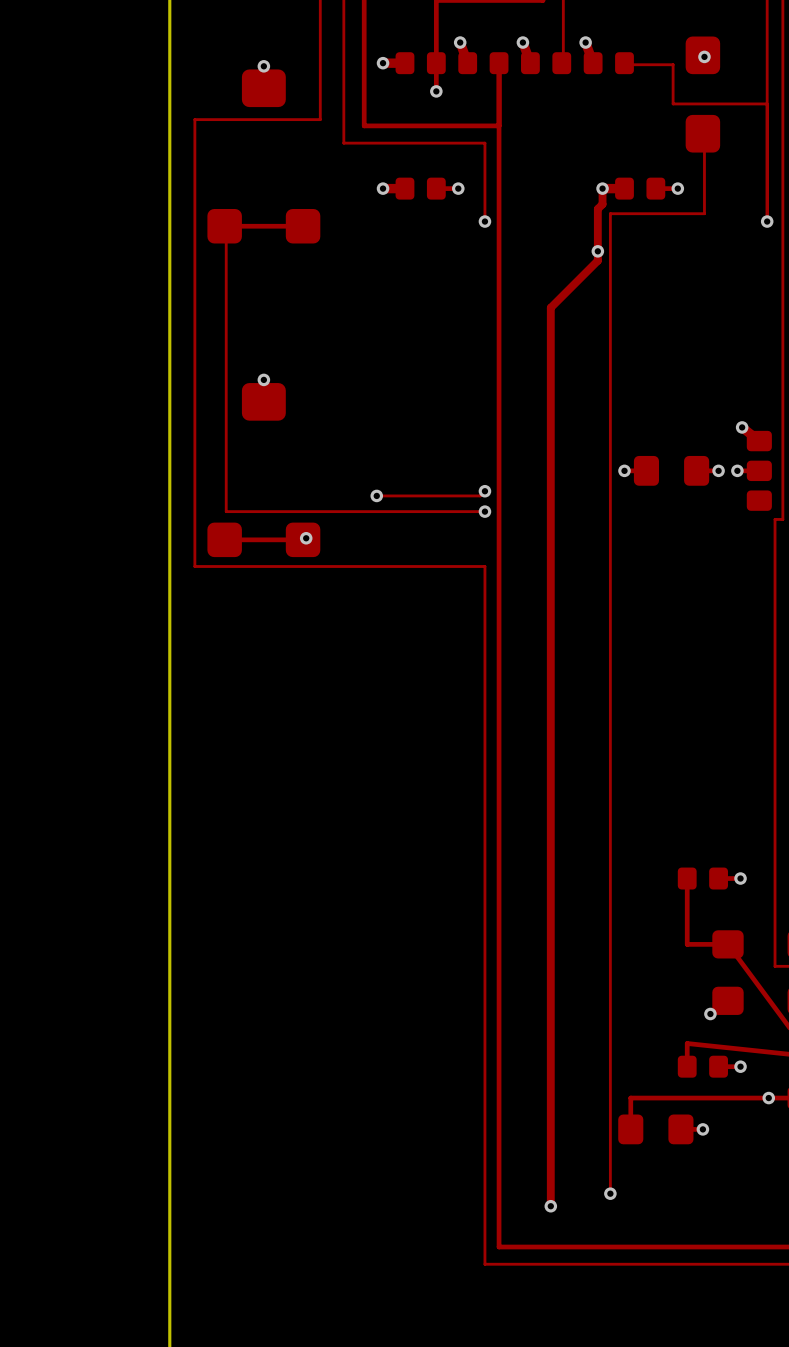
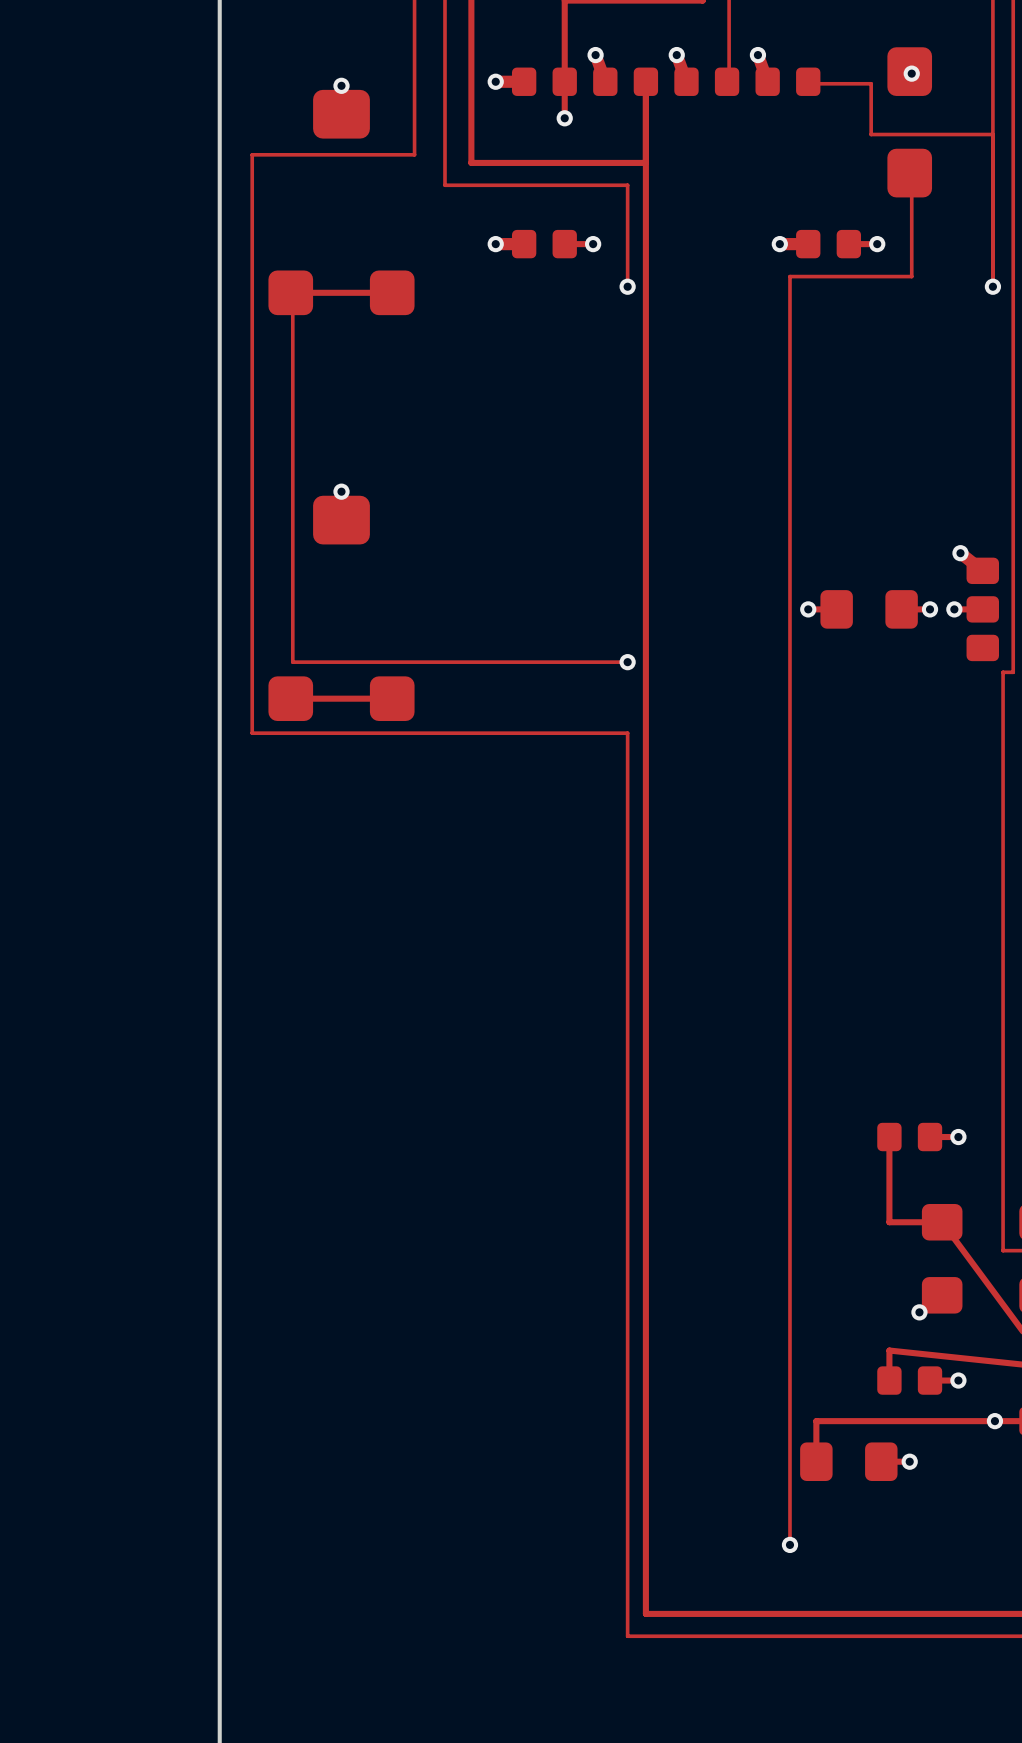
track: (602, 188) (602, 204) (597, 208) (597, 260) (550, 307) (550, 1206) -> none
via: (597, 251) -> none
track: (484, 491) (480, 495) (376, 495) -> none
via: (484, 491) -> none
via: (376, 495) -> none
via: (306, 538) -> none
via: (550, 1206) -> none

